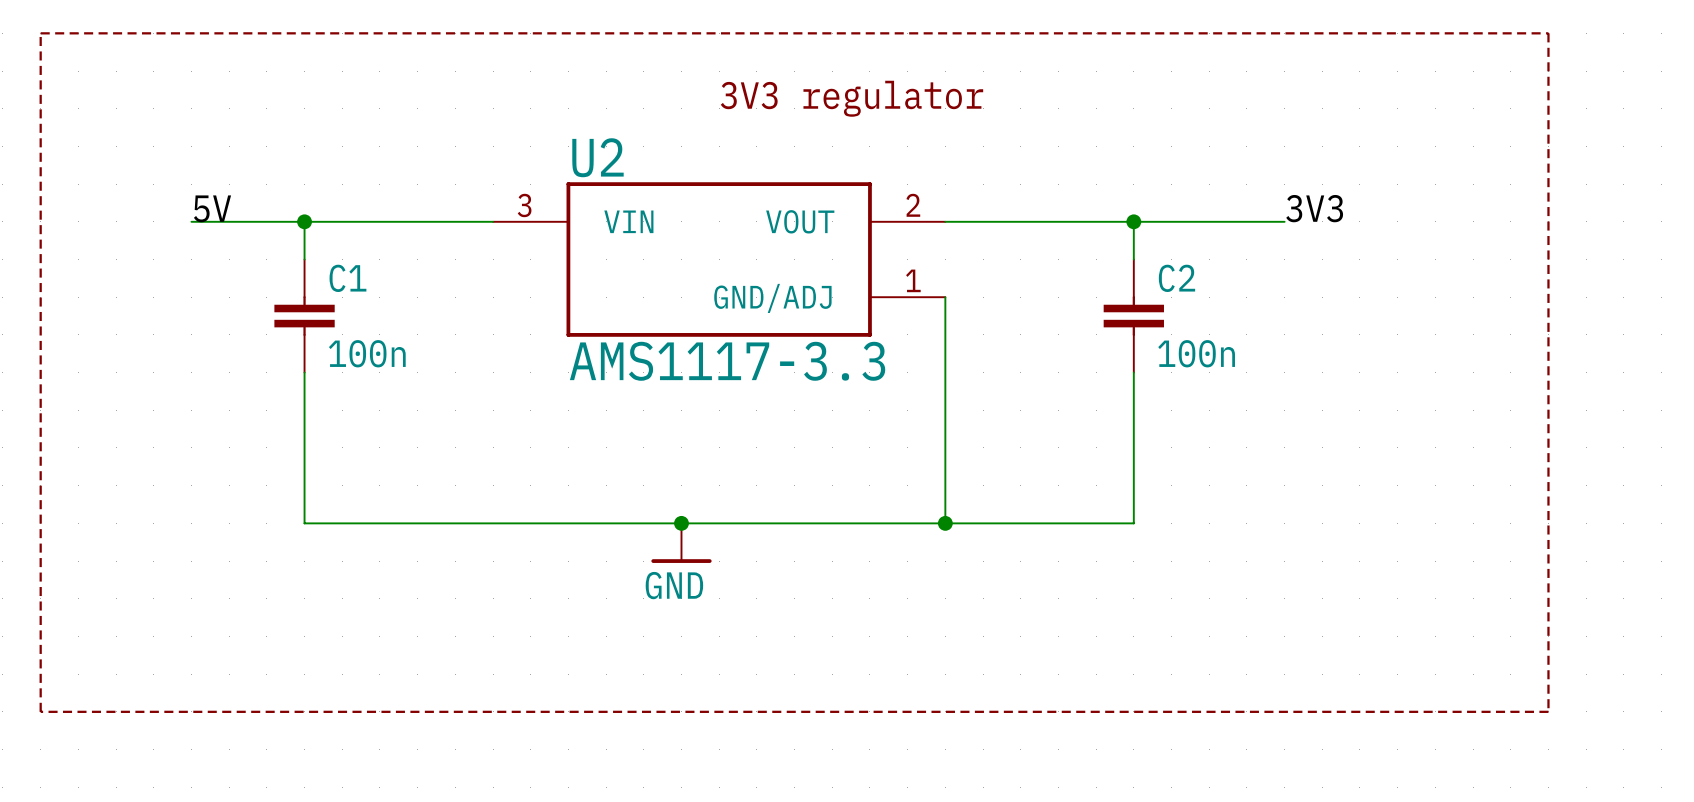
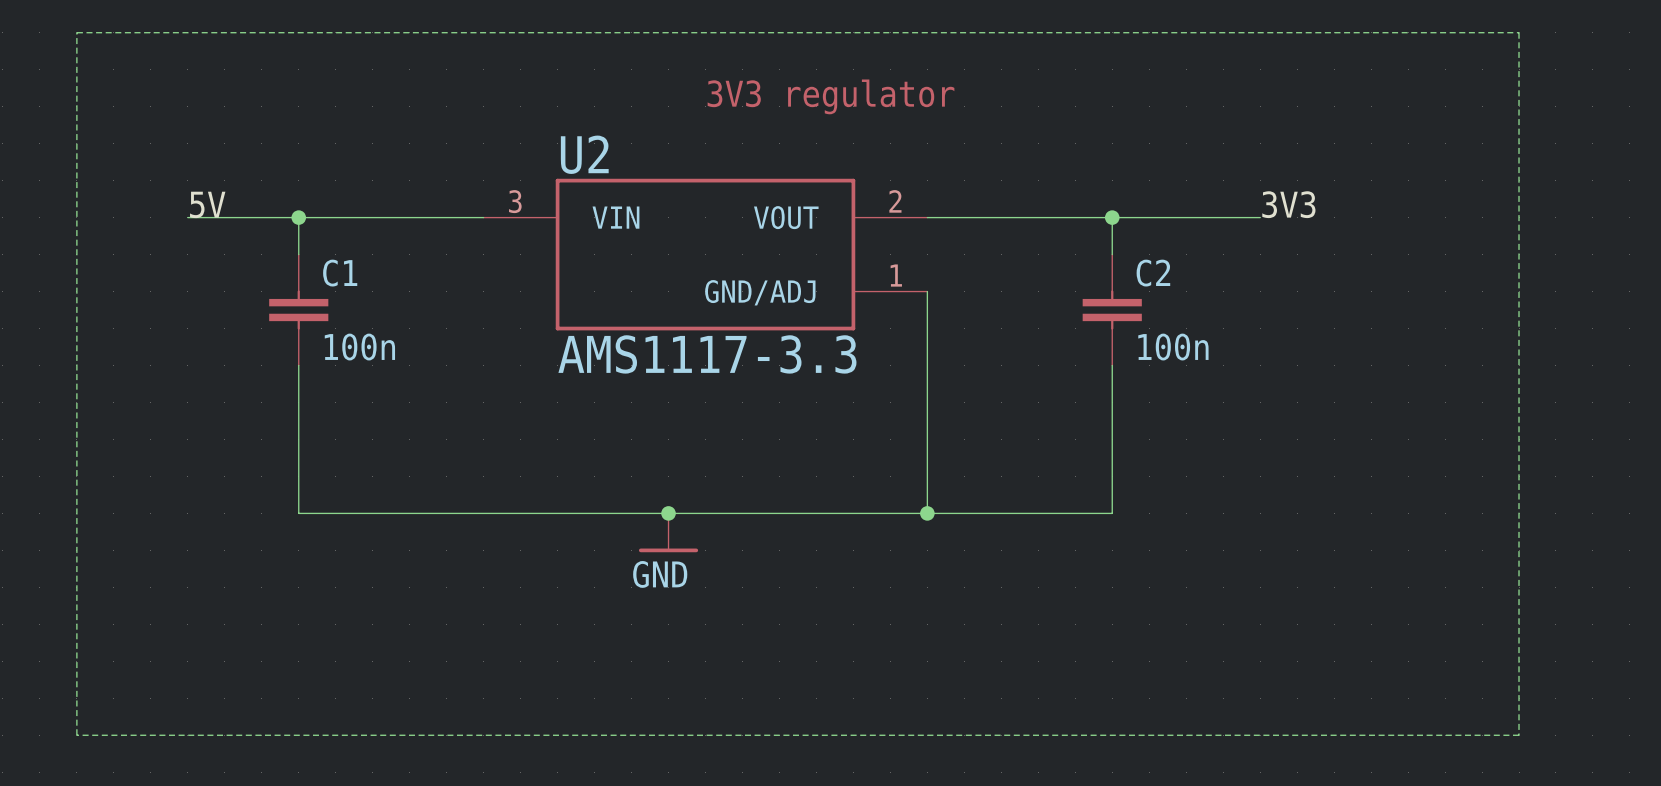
line: (40, 33) (40, 711) (1548, 711) (1548, 33) (40, 33) -> none
wire: none -> (76, 32) (76, 735) (1519, 735) (1519, 32) (76, 32)

